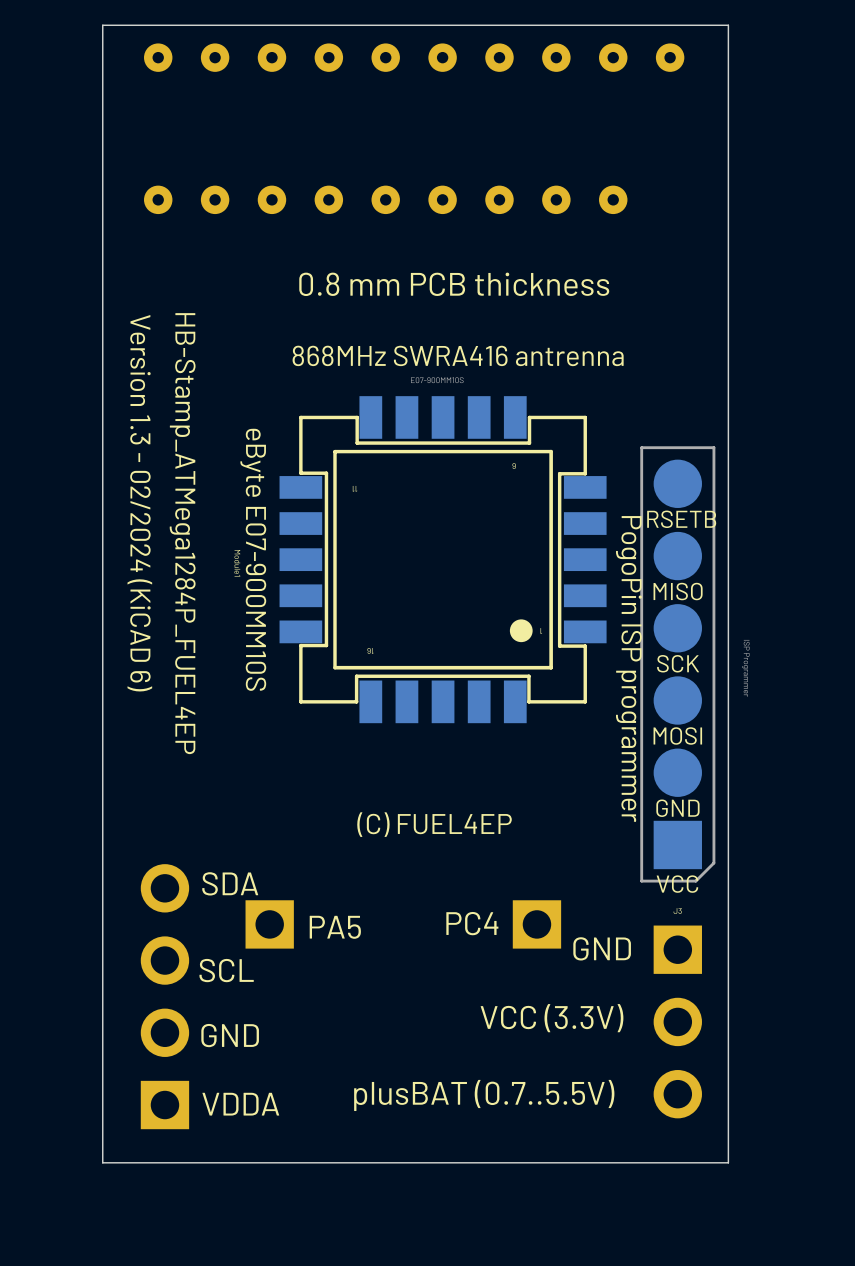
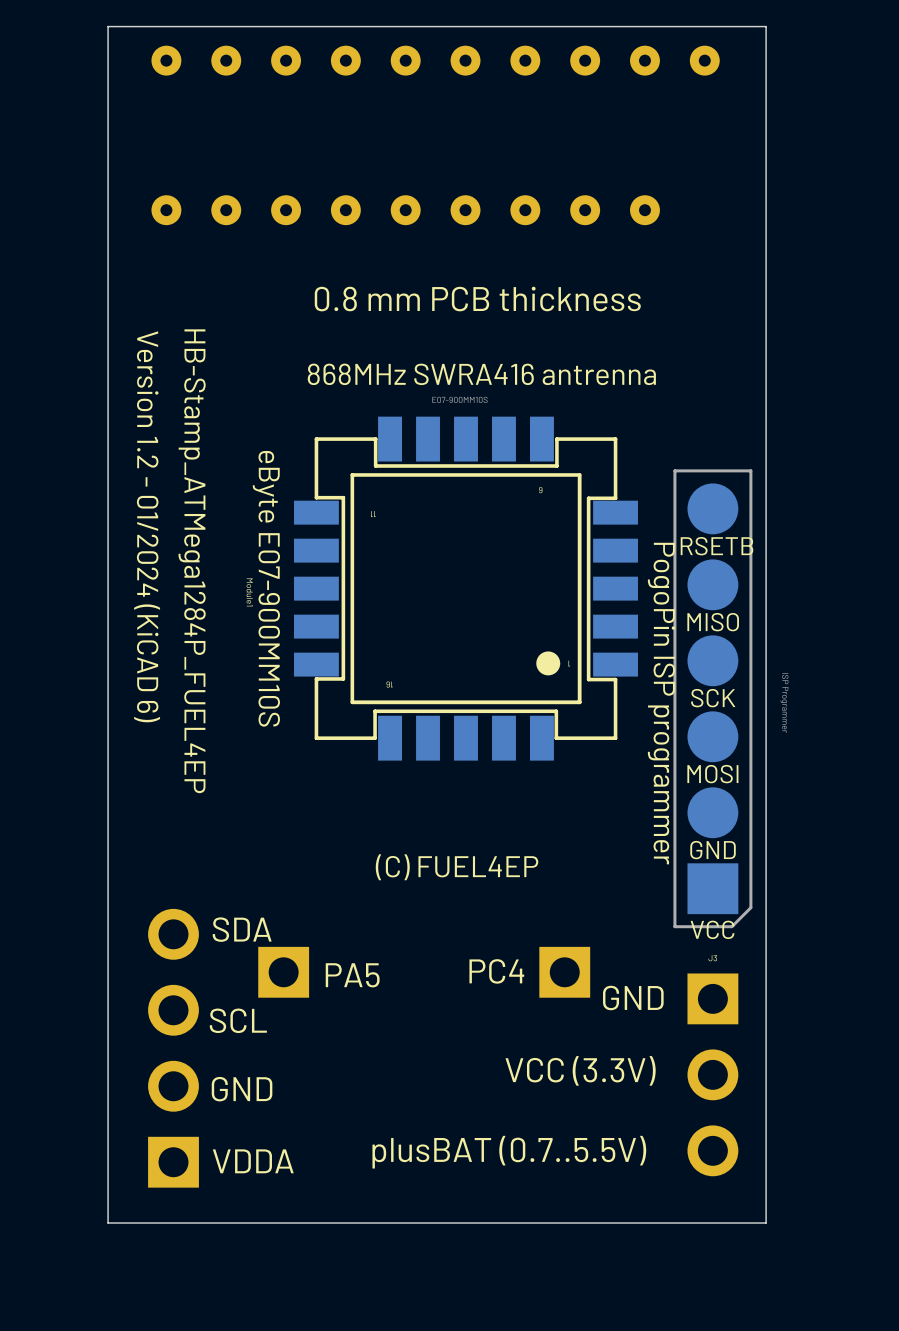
text: Version 1.3 - 02/2024 (KiCAD 6) (139, 503) -> Version 1.2 - 01/2024 (KiCAD 6) (147, 526)

